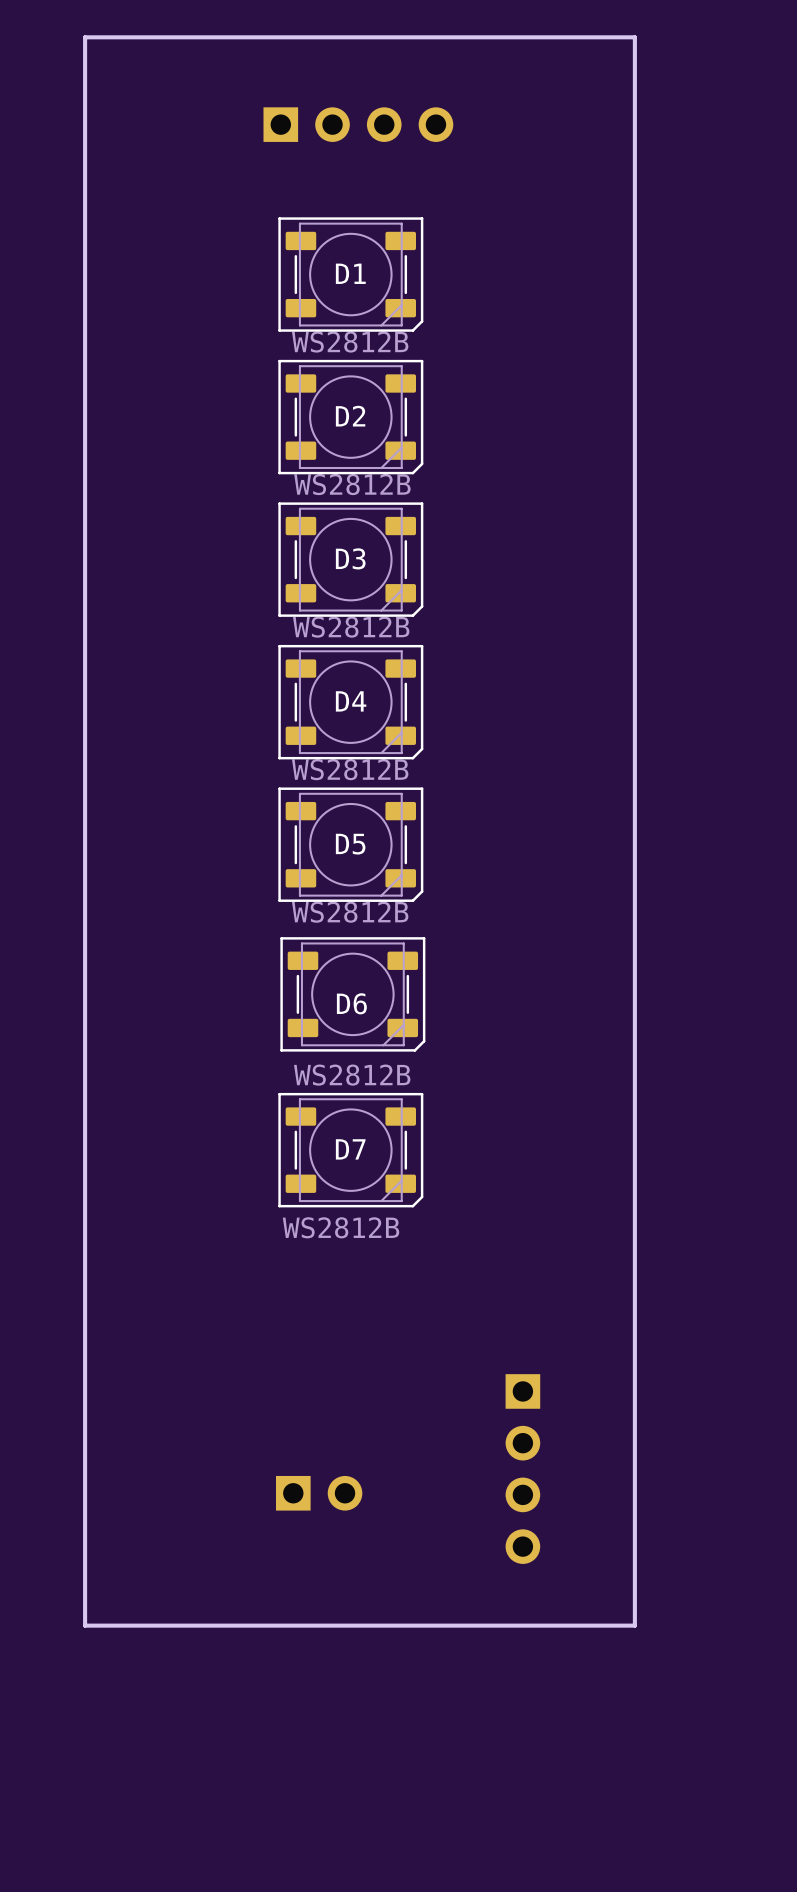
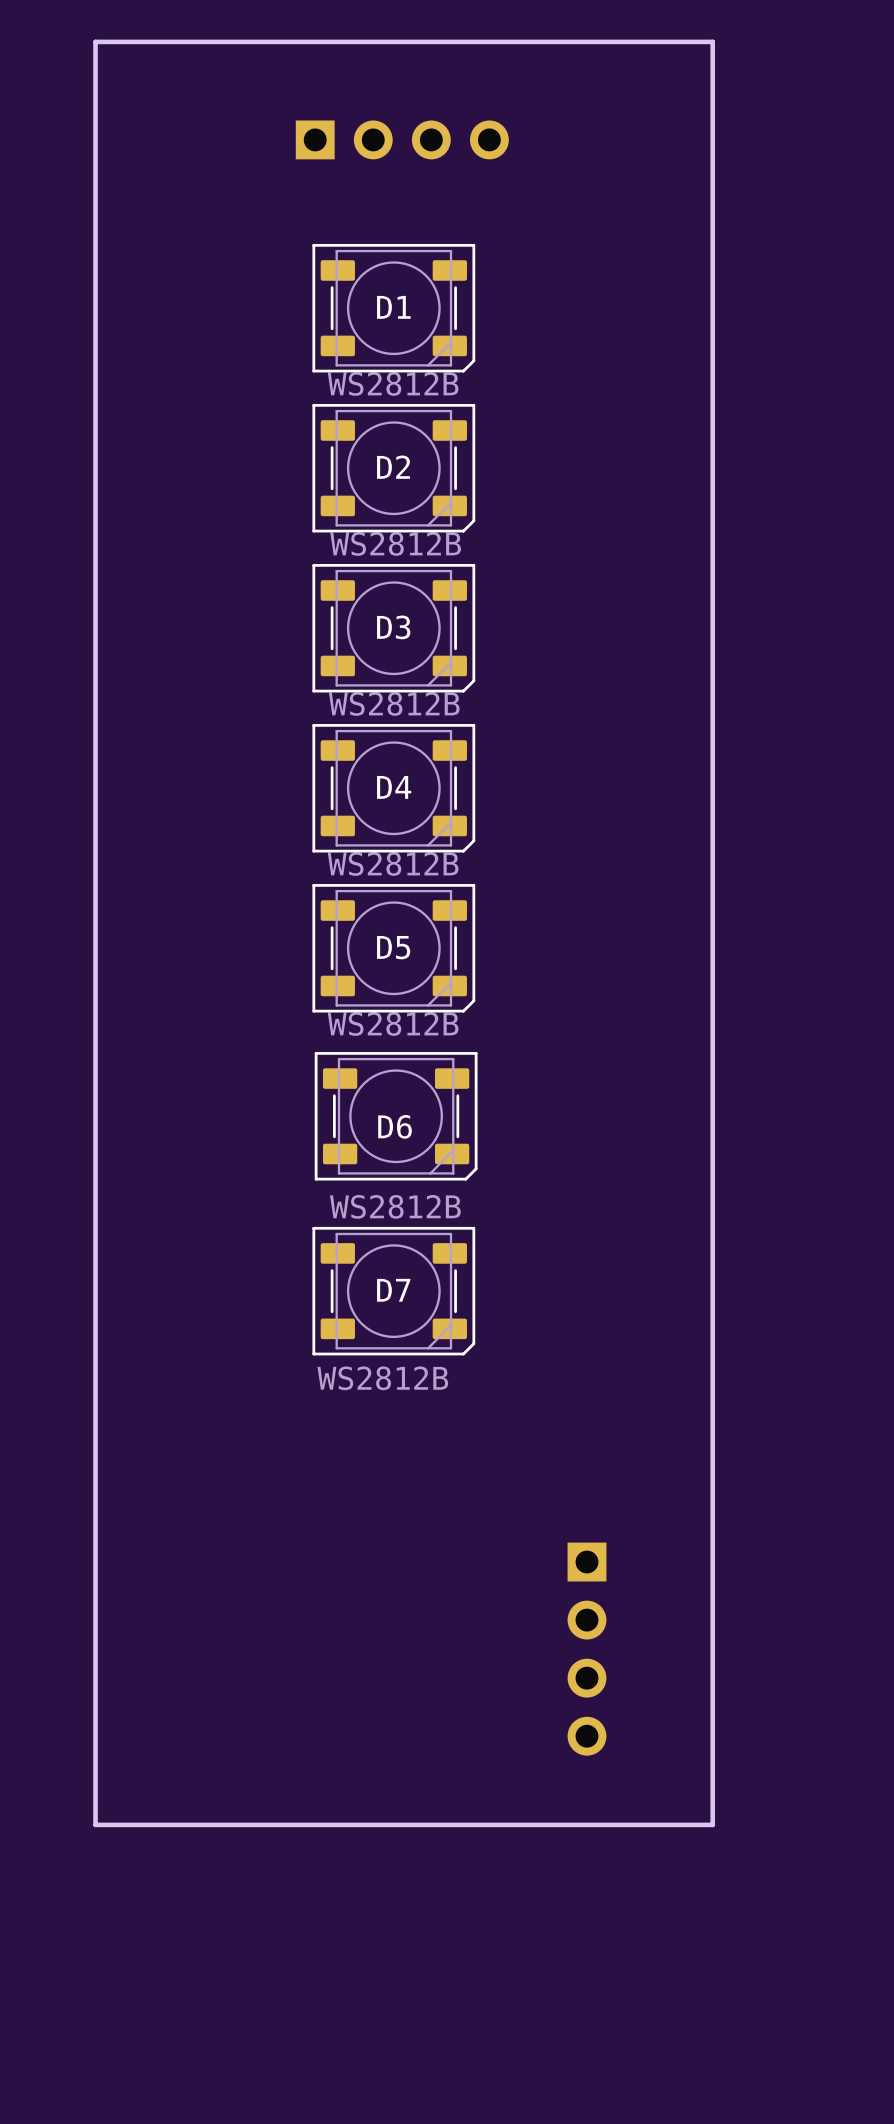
part: (319, 1493) -> none

